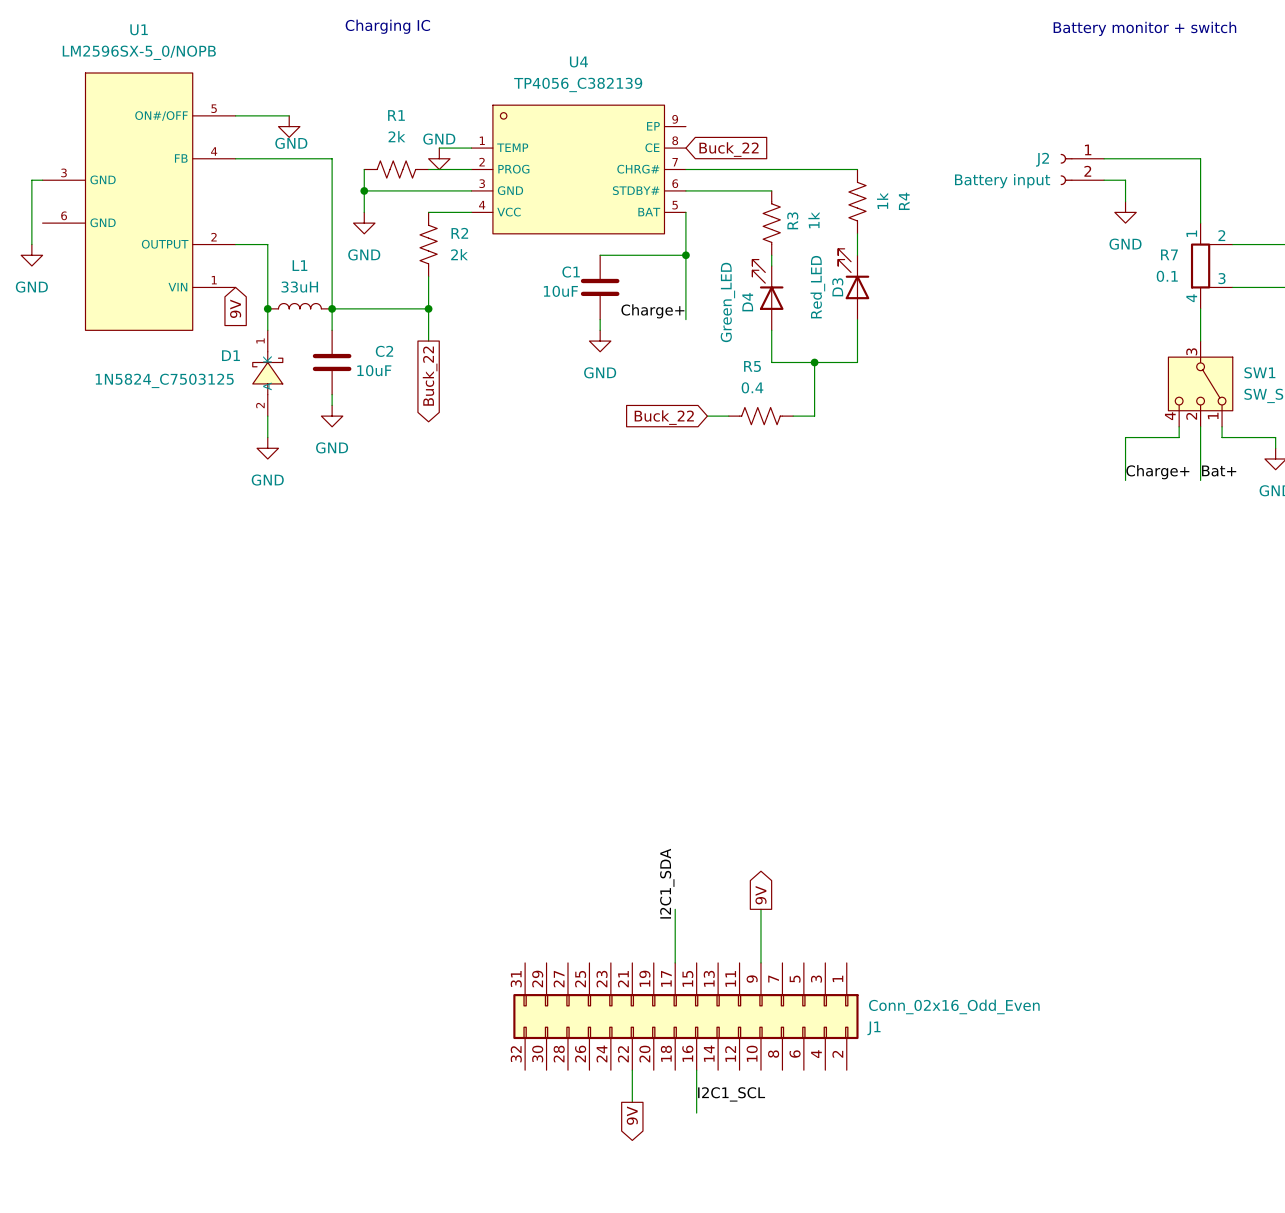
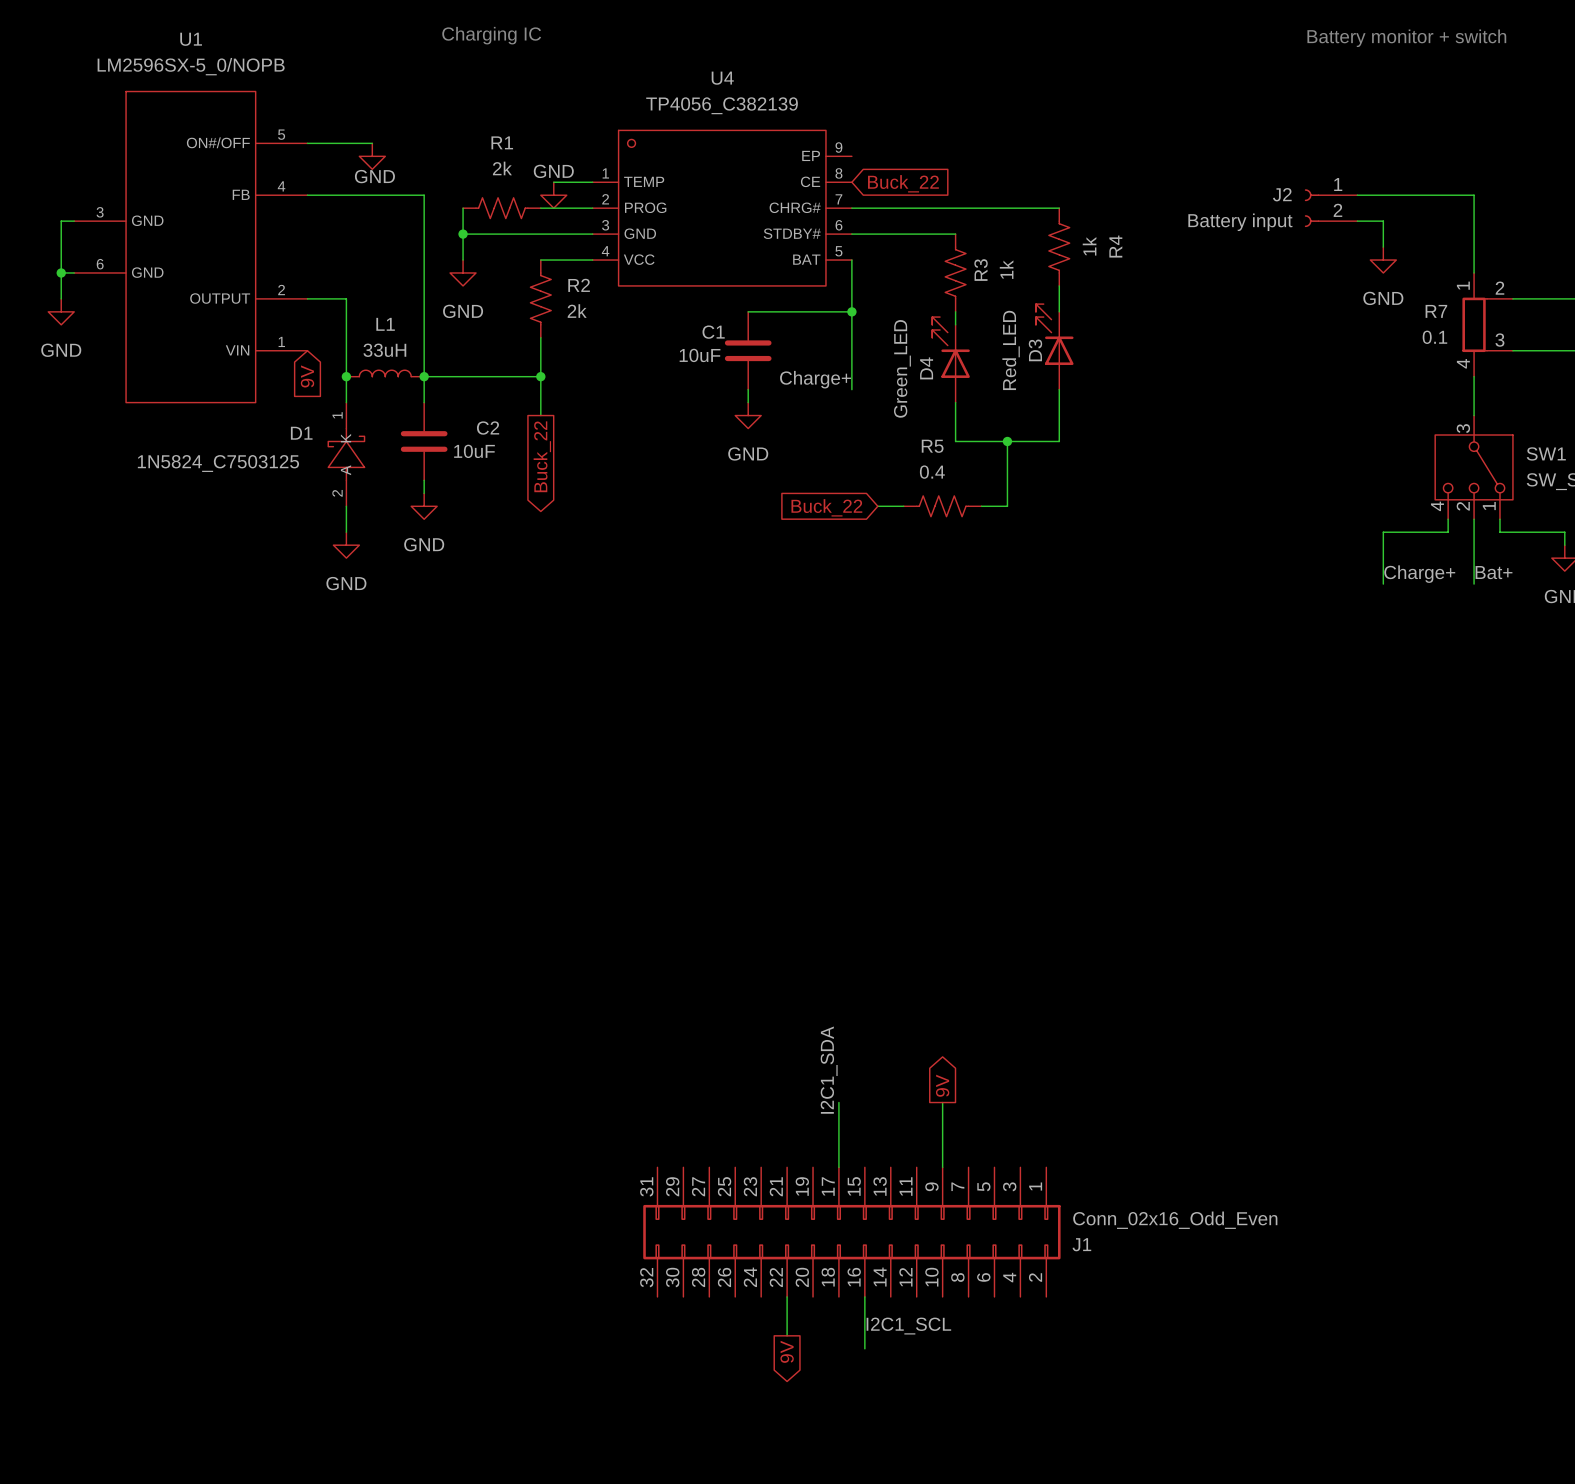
wire: none -> (61, 272) (74, 272)
junction: none -> (61, 272)

